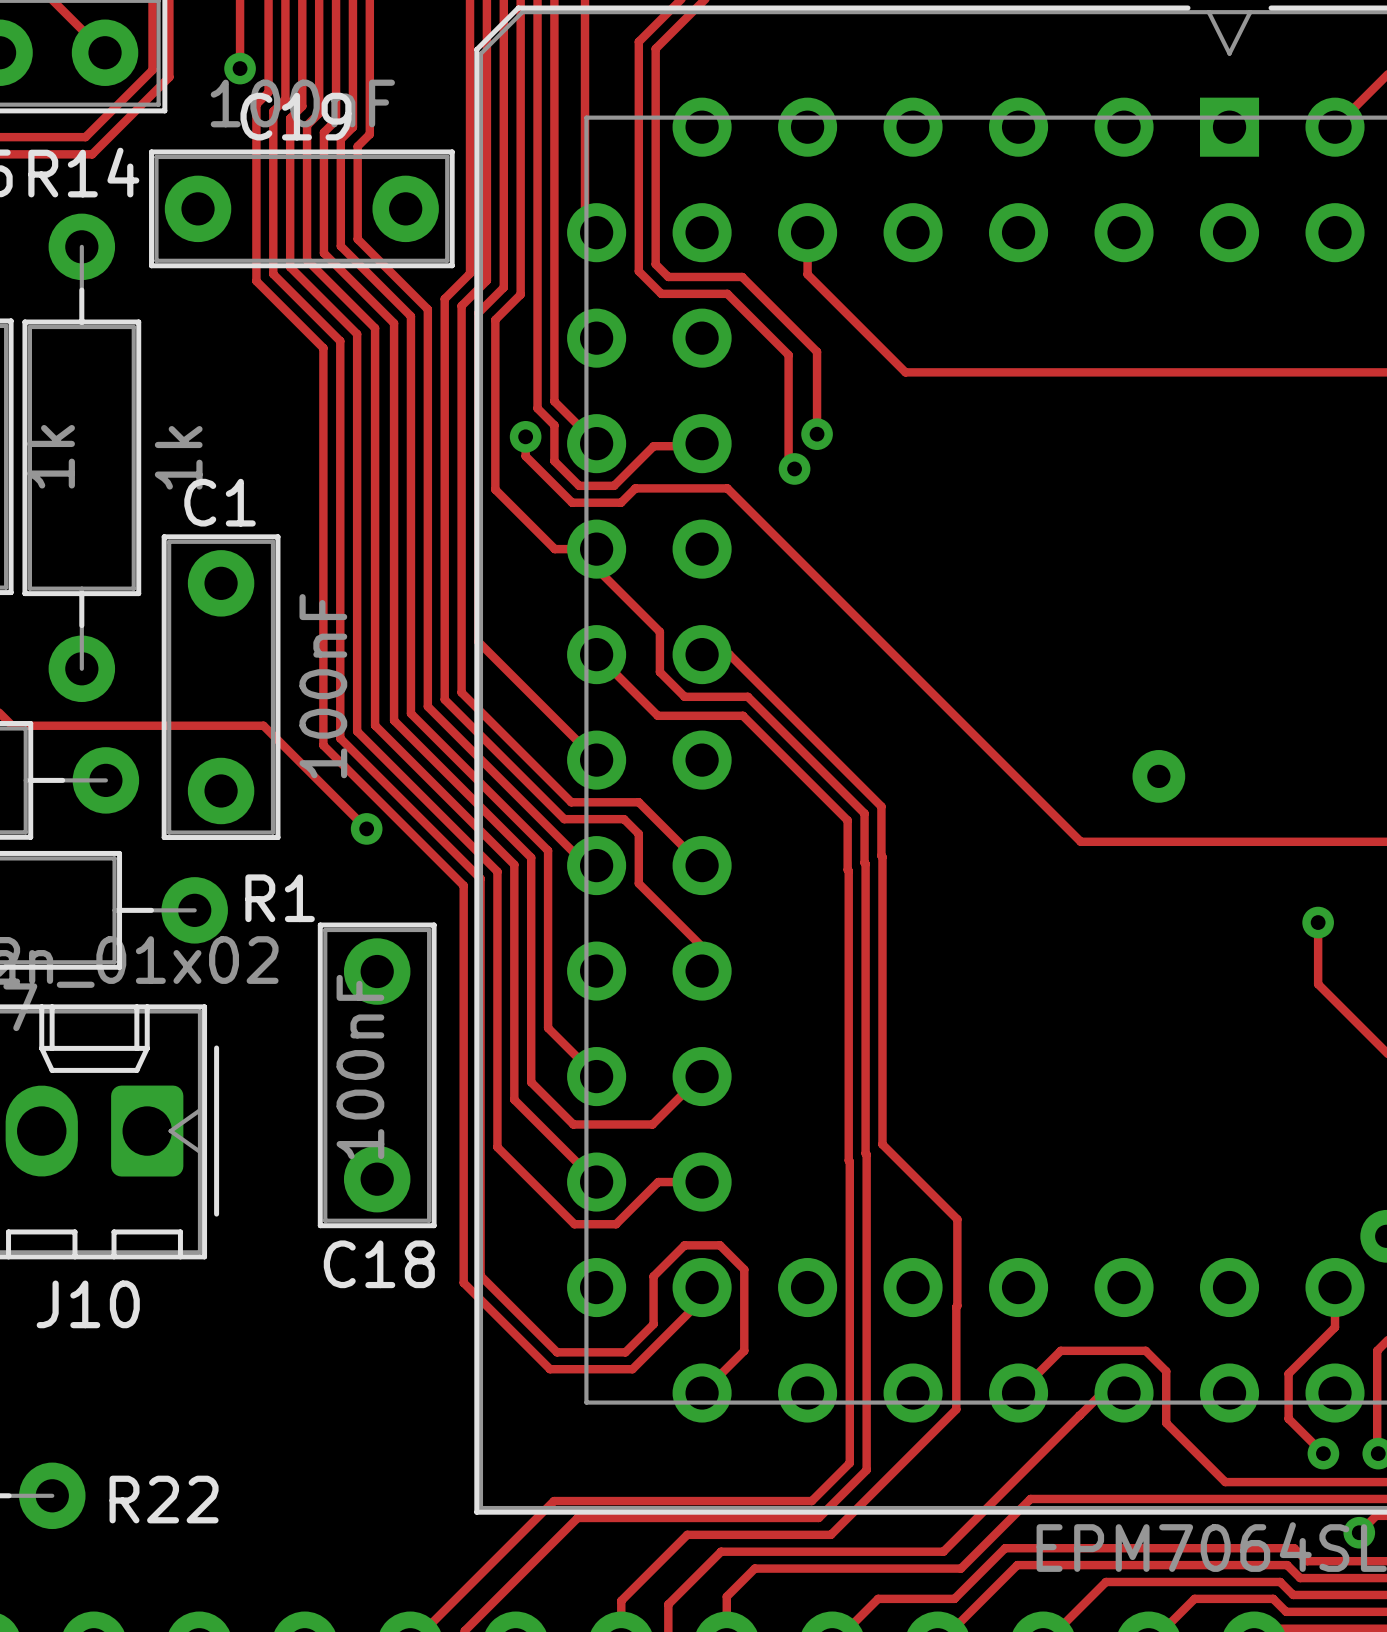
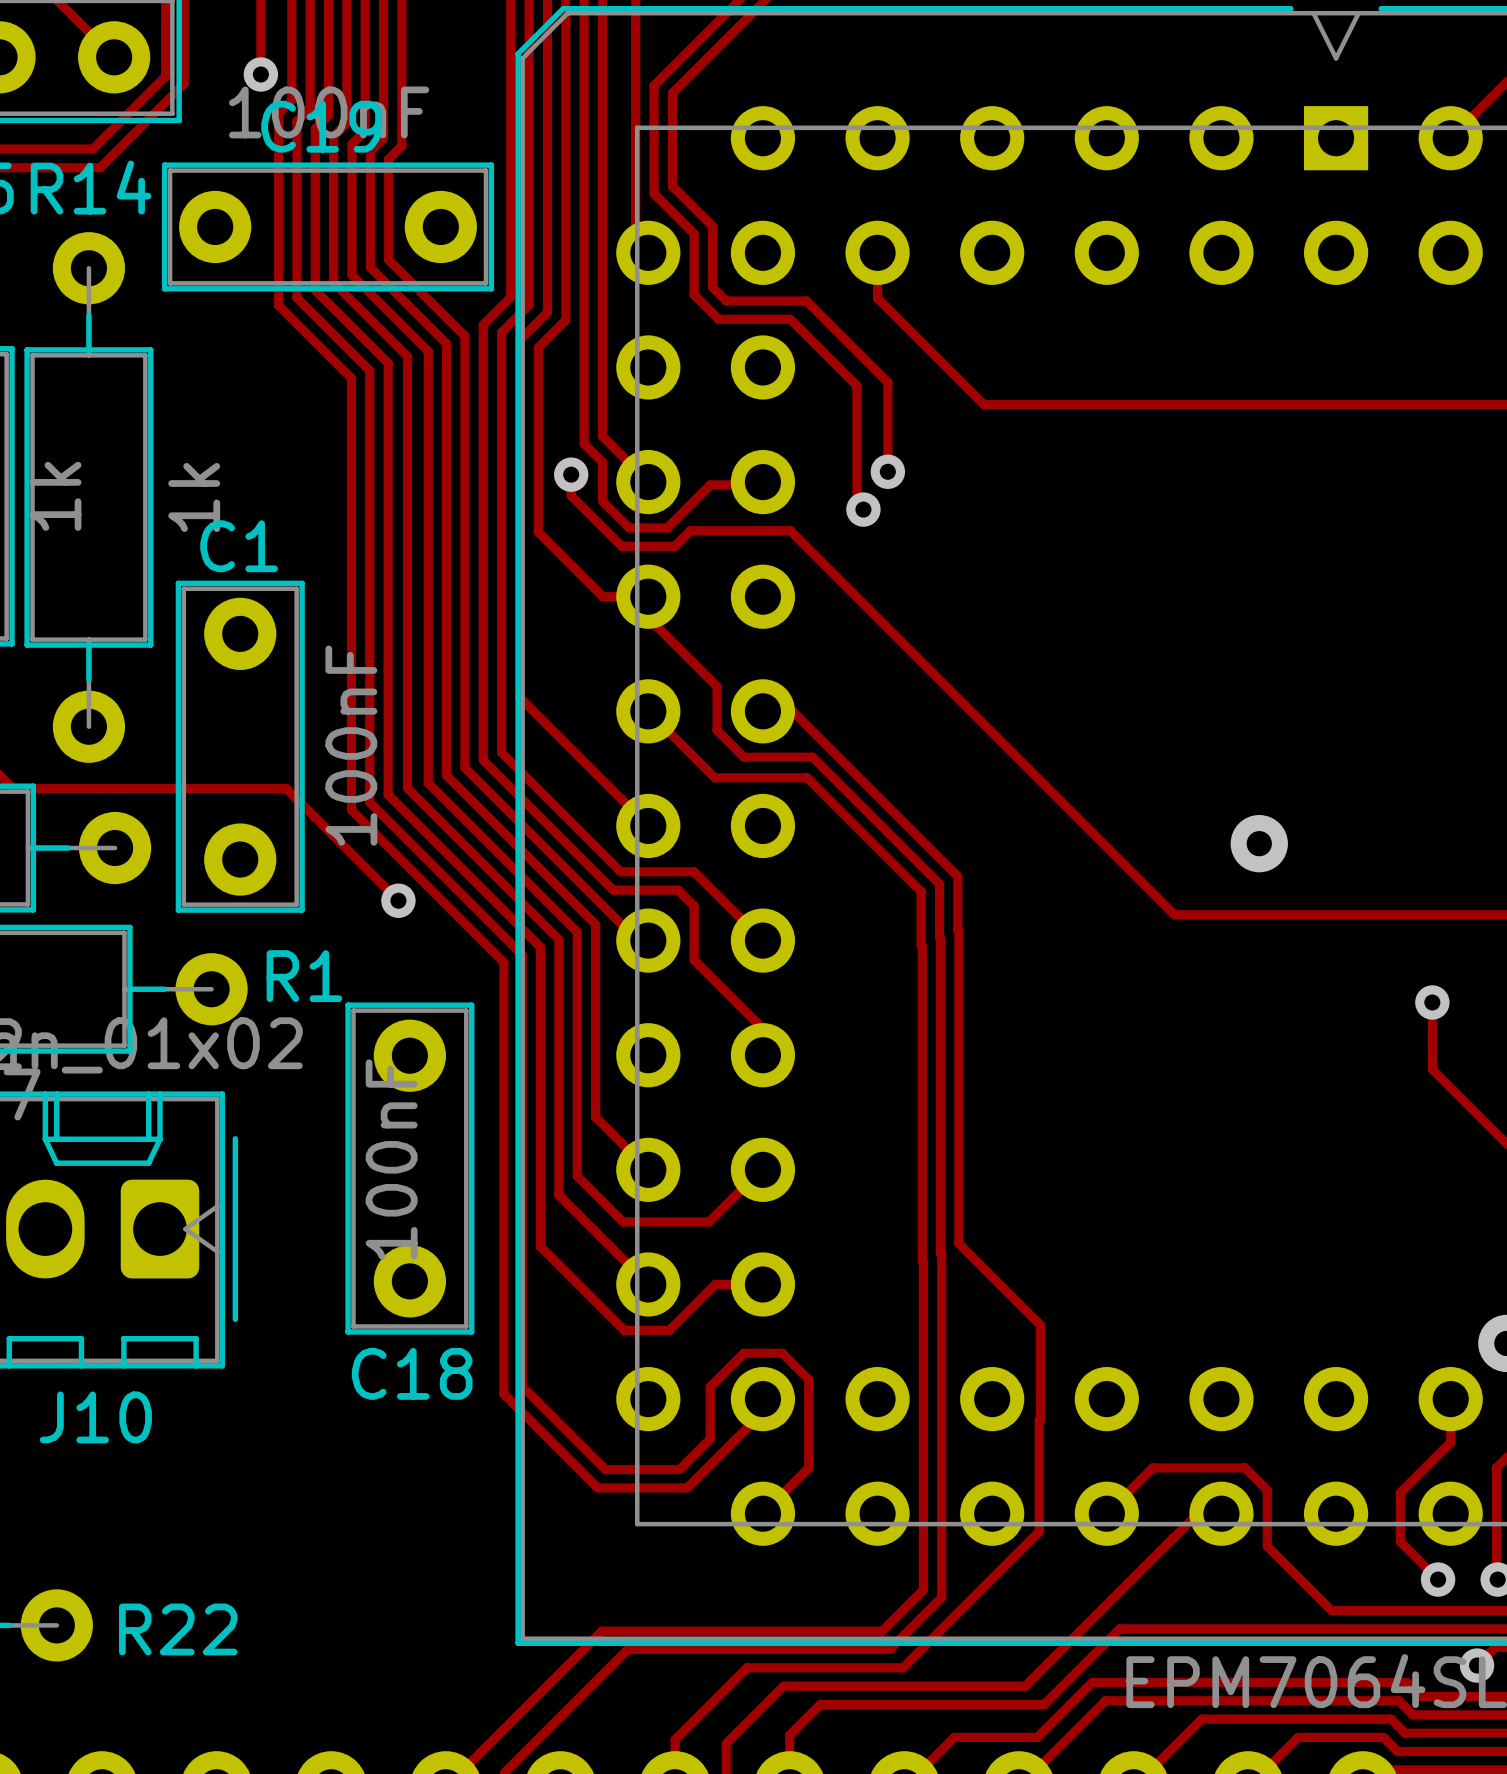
track: (638, 41) (638, 215) -> (694, 45) (654, 85) (654, 193) (694, 233)
track: (655, 48) (655, 208) -> (712, 53) (672, 93) (672, 186) (712, 226)

